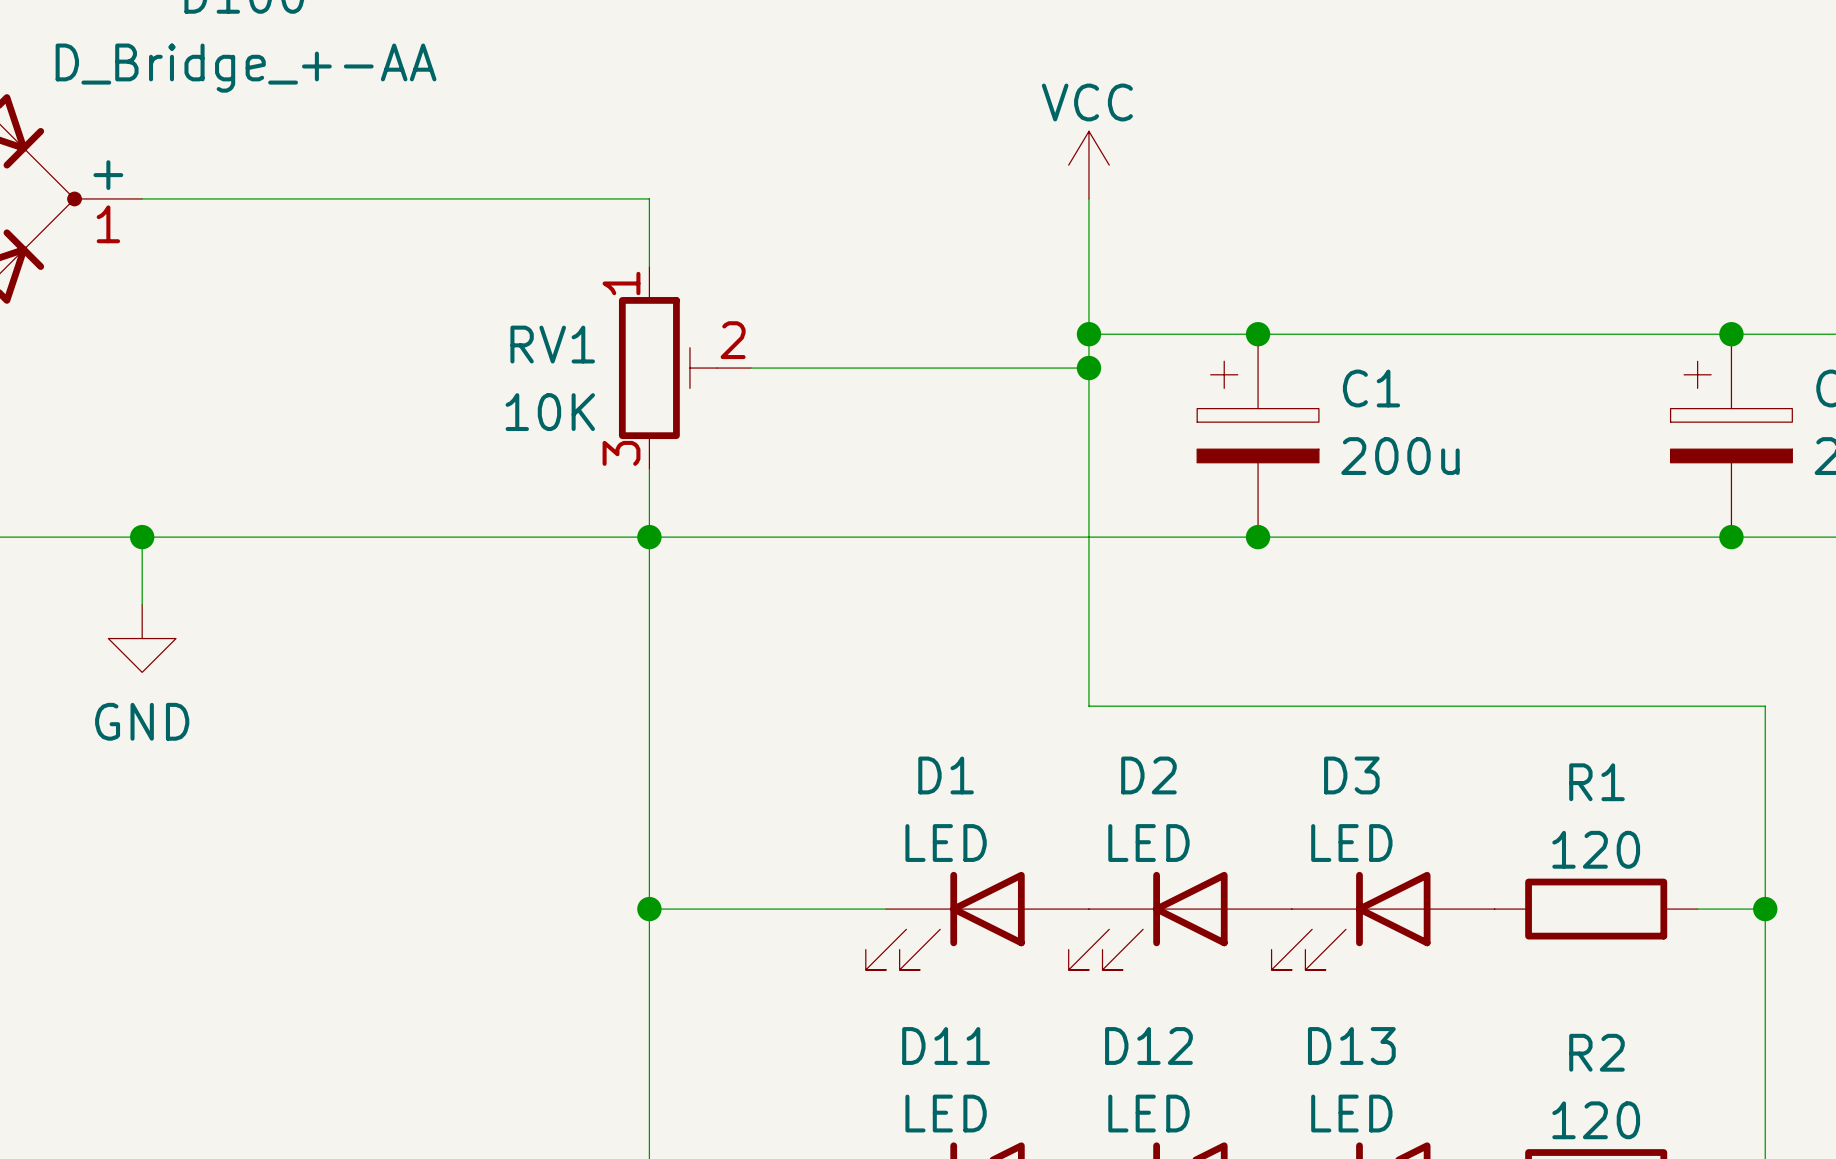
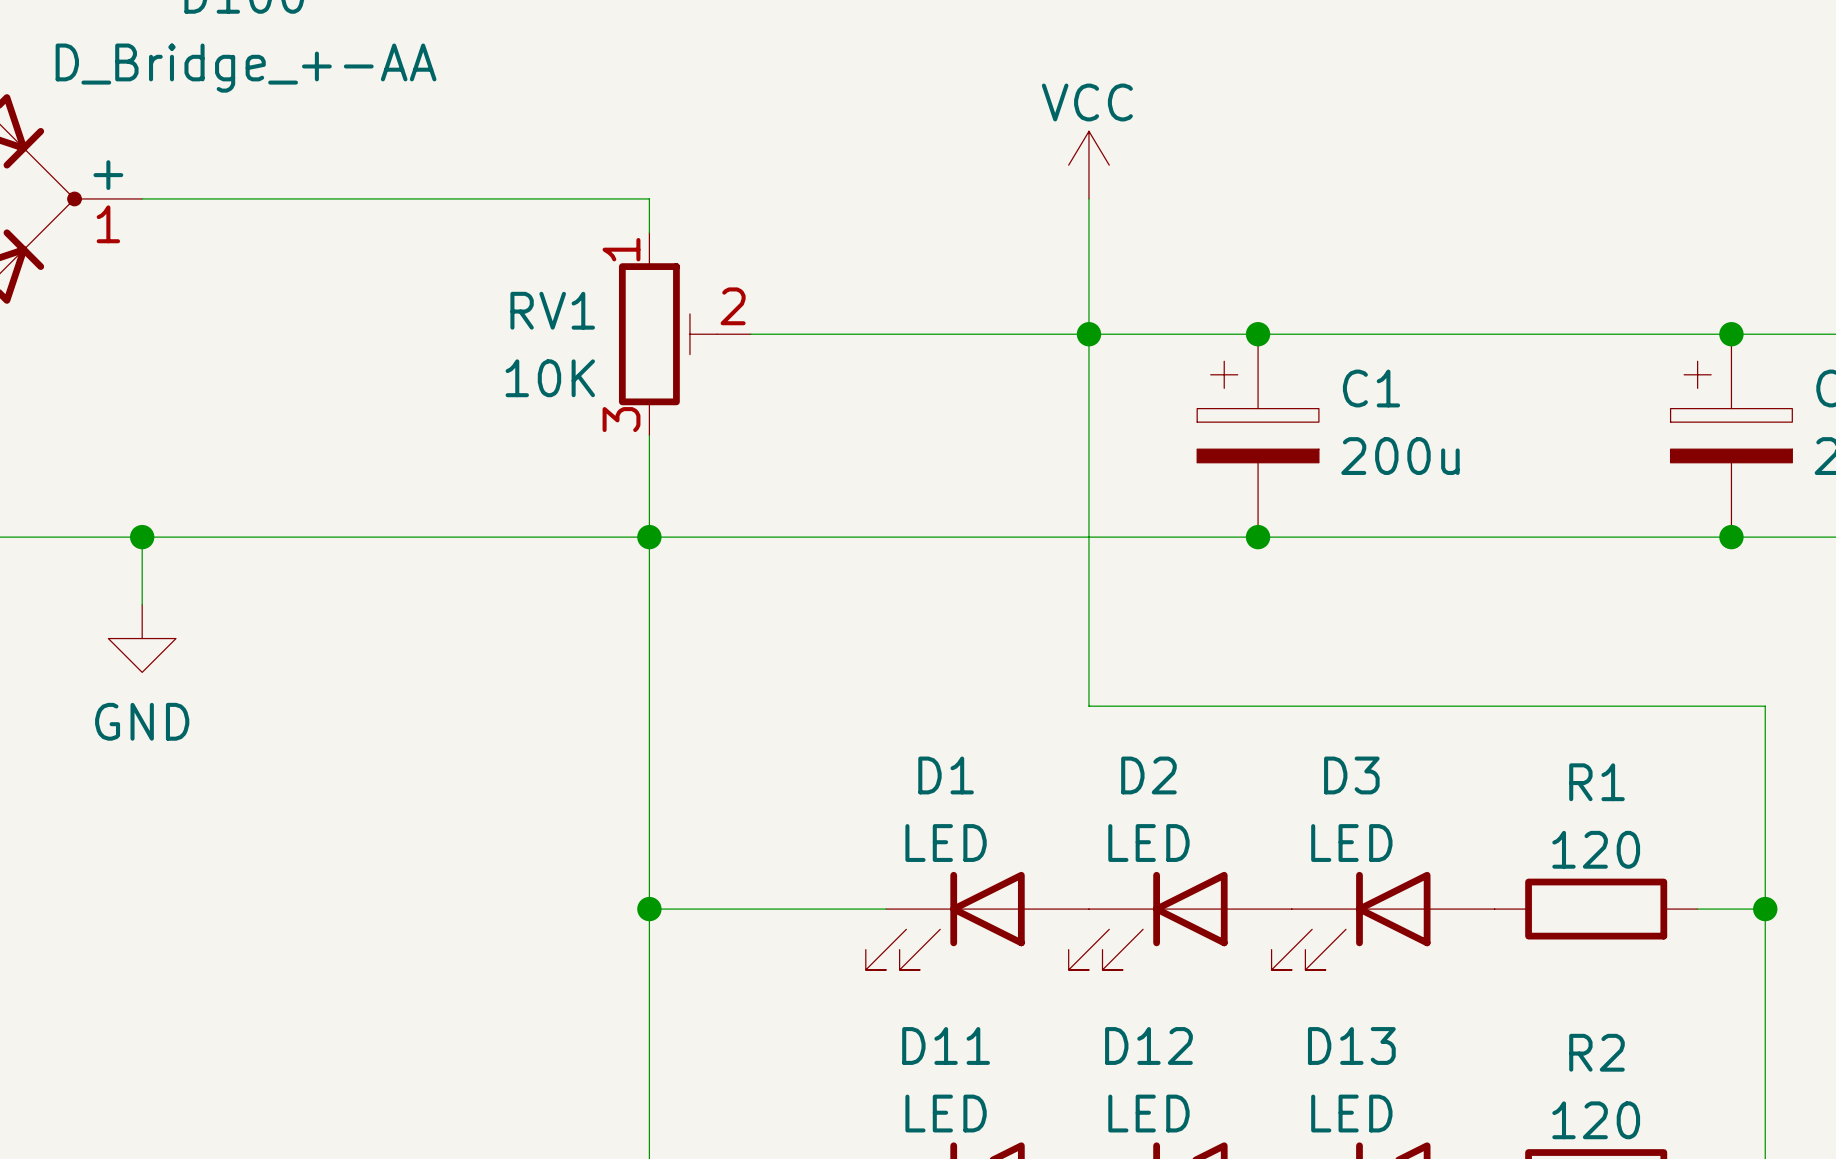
RV1 position: (684, 368) -> (684, 334)
wire: (750, 368) (1088, 368) -> (750, 334) (1088, 334)
junction: (1088, 368) -> none

